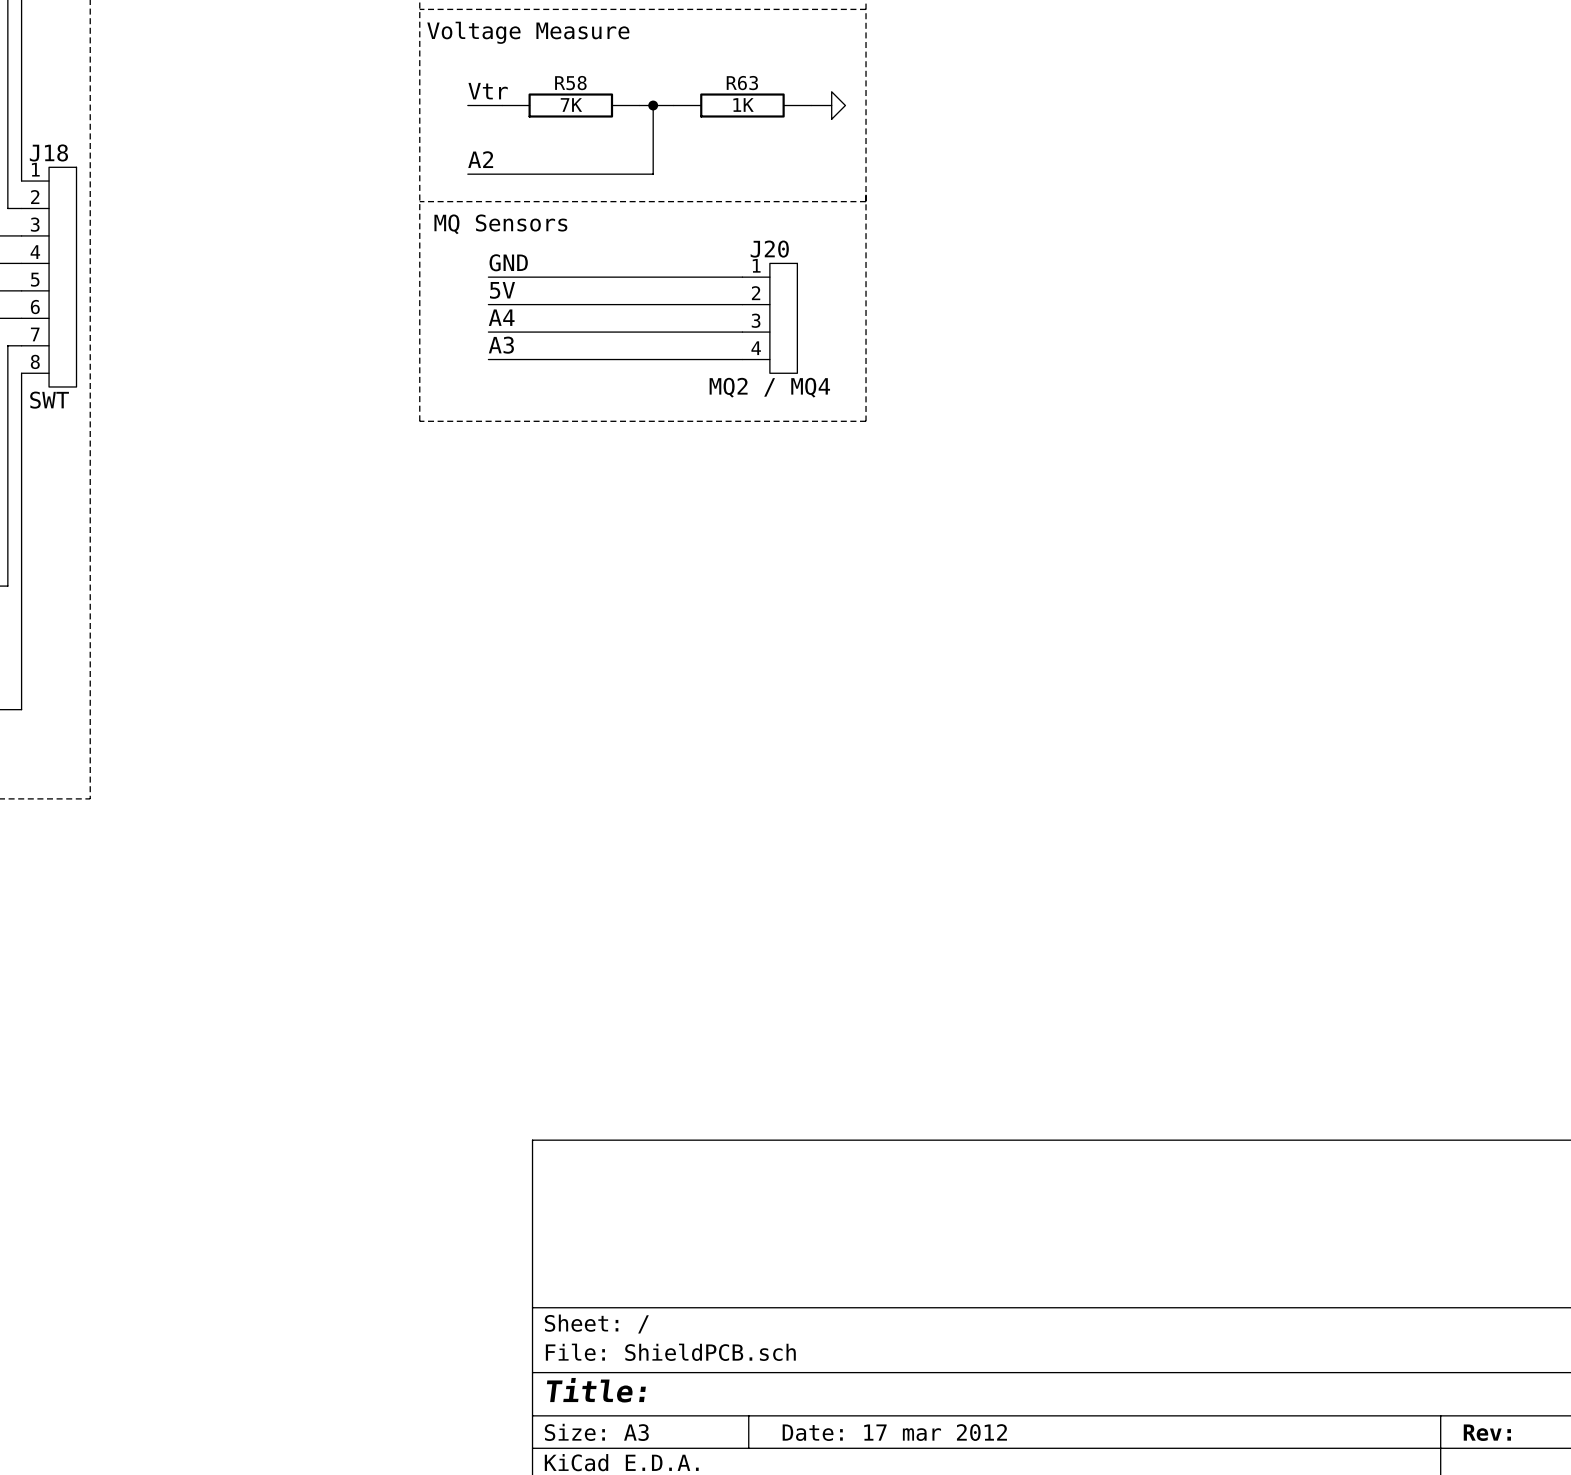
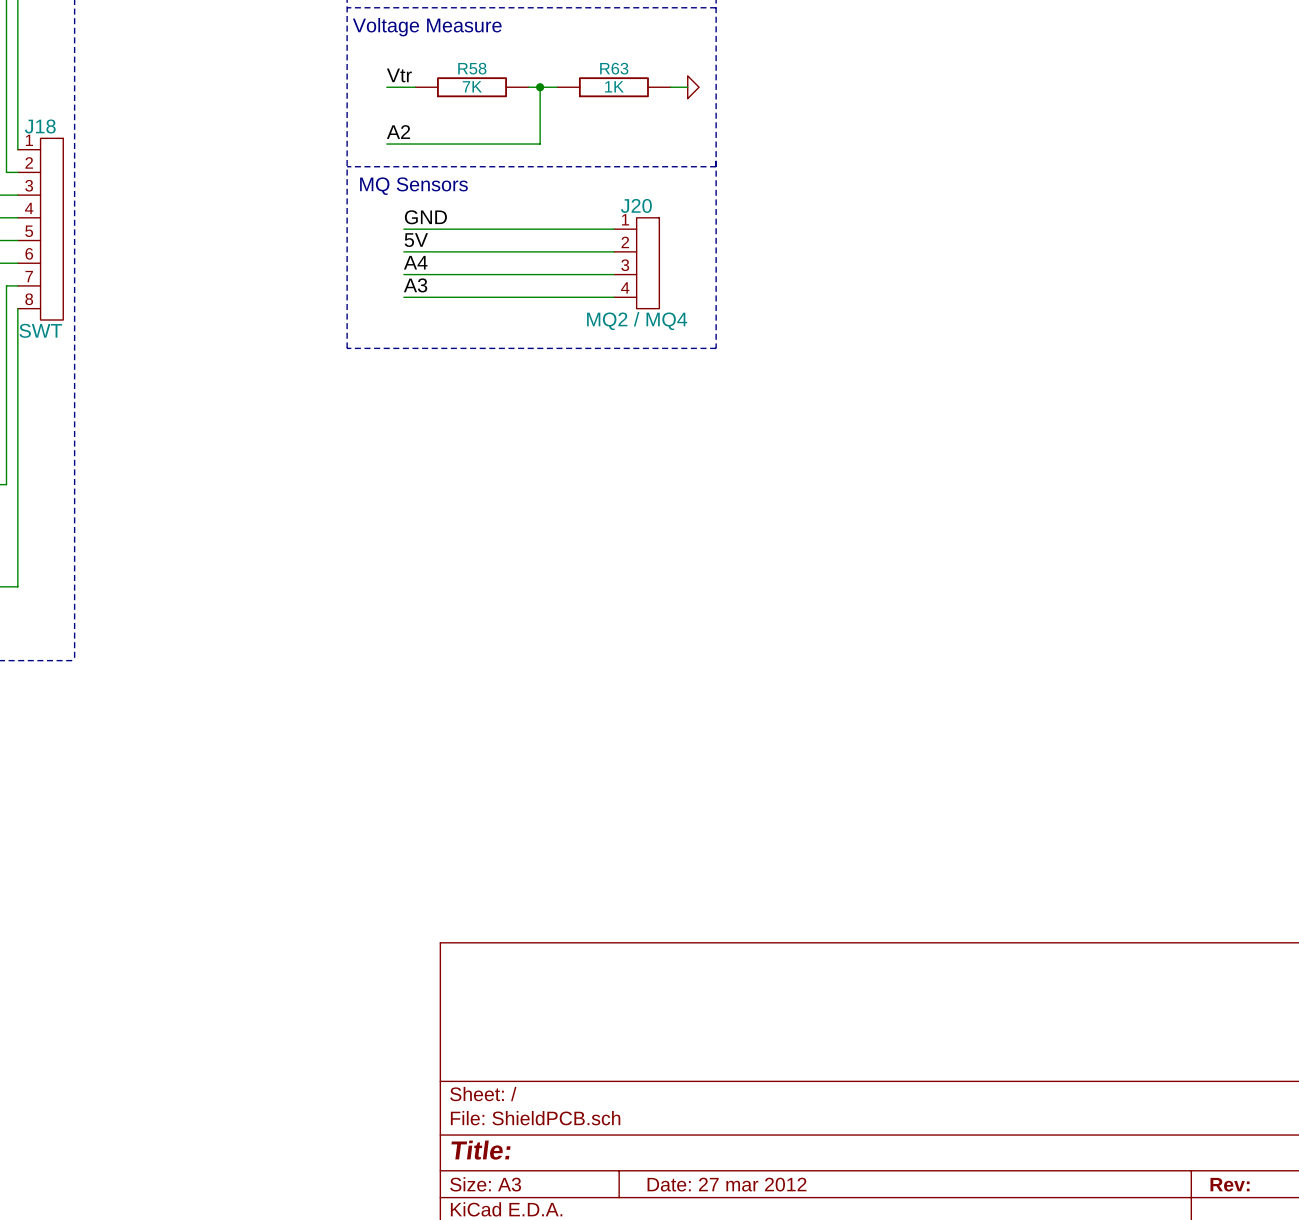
title block: Date: 17 mar 2012 (894, 1432) -> Date: 27 mar 2012 (727, 1184)

